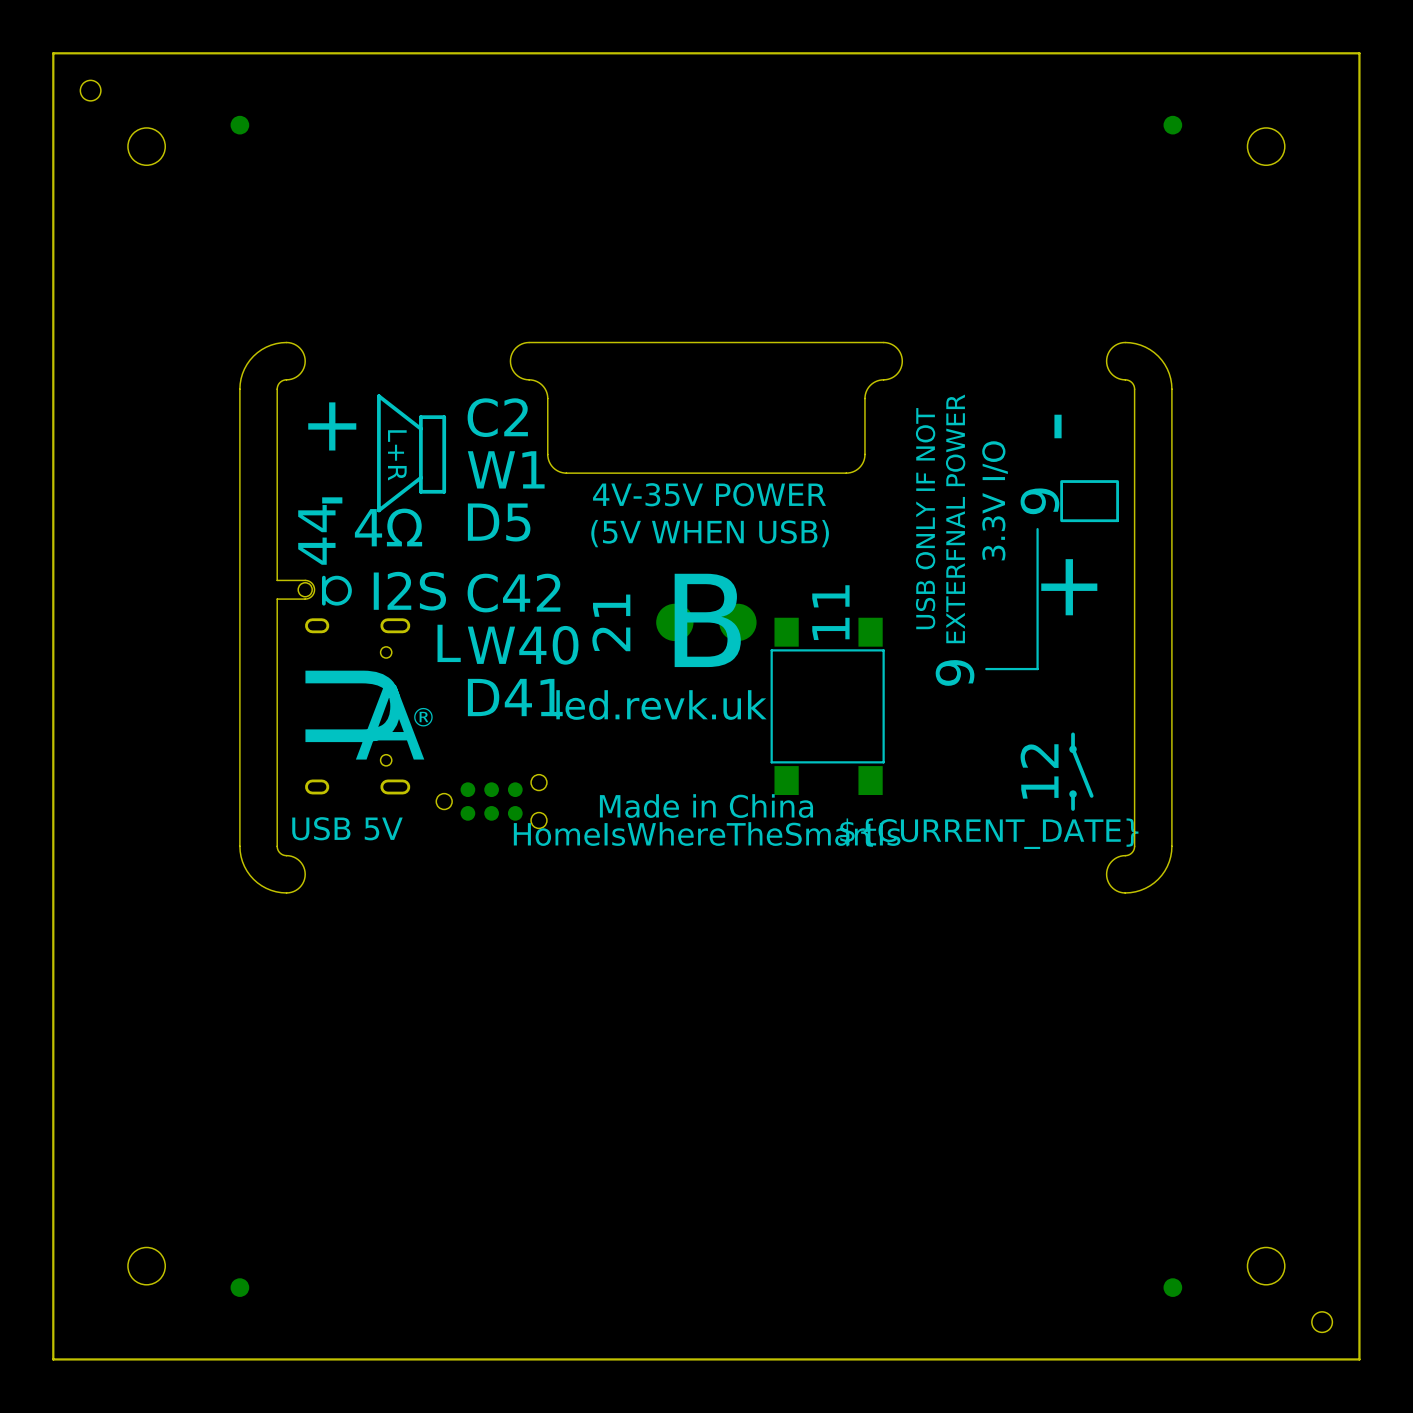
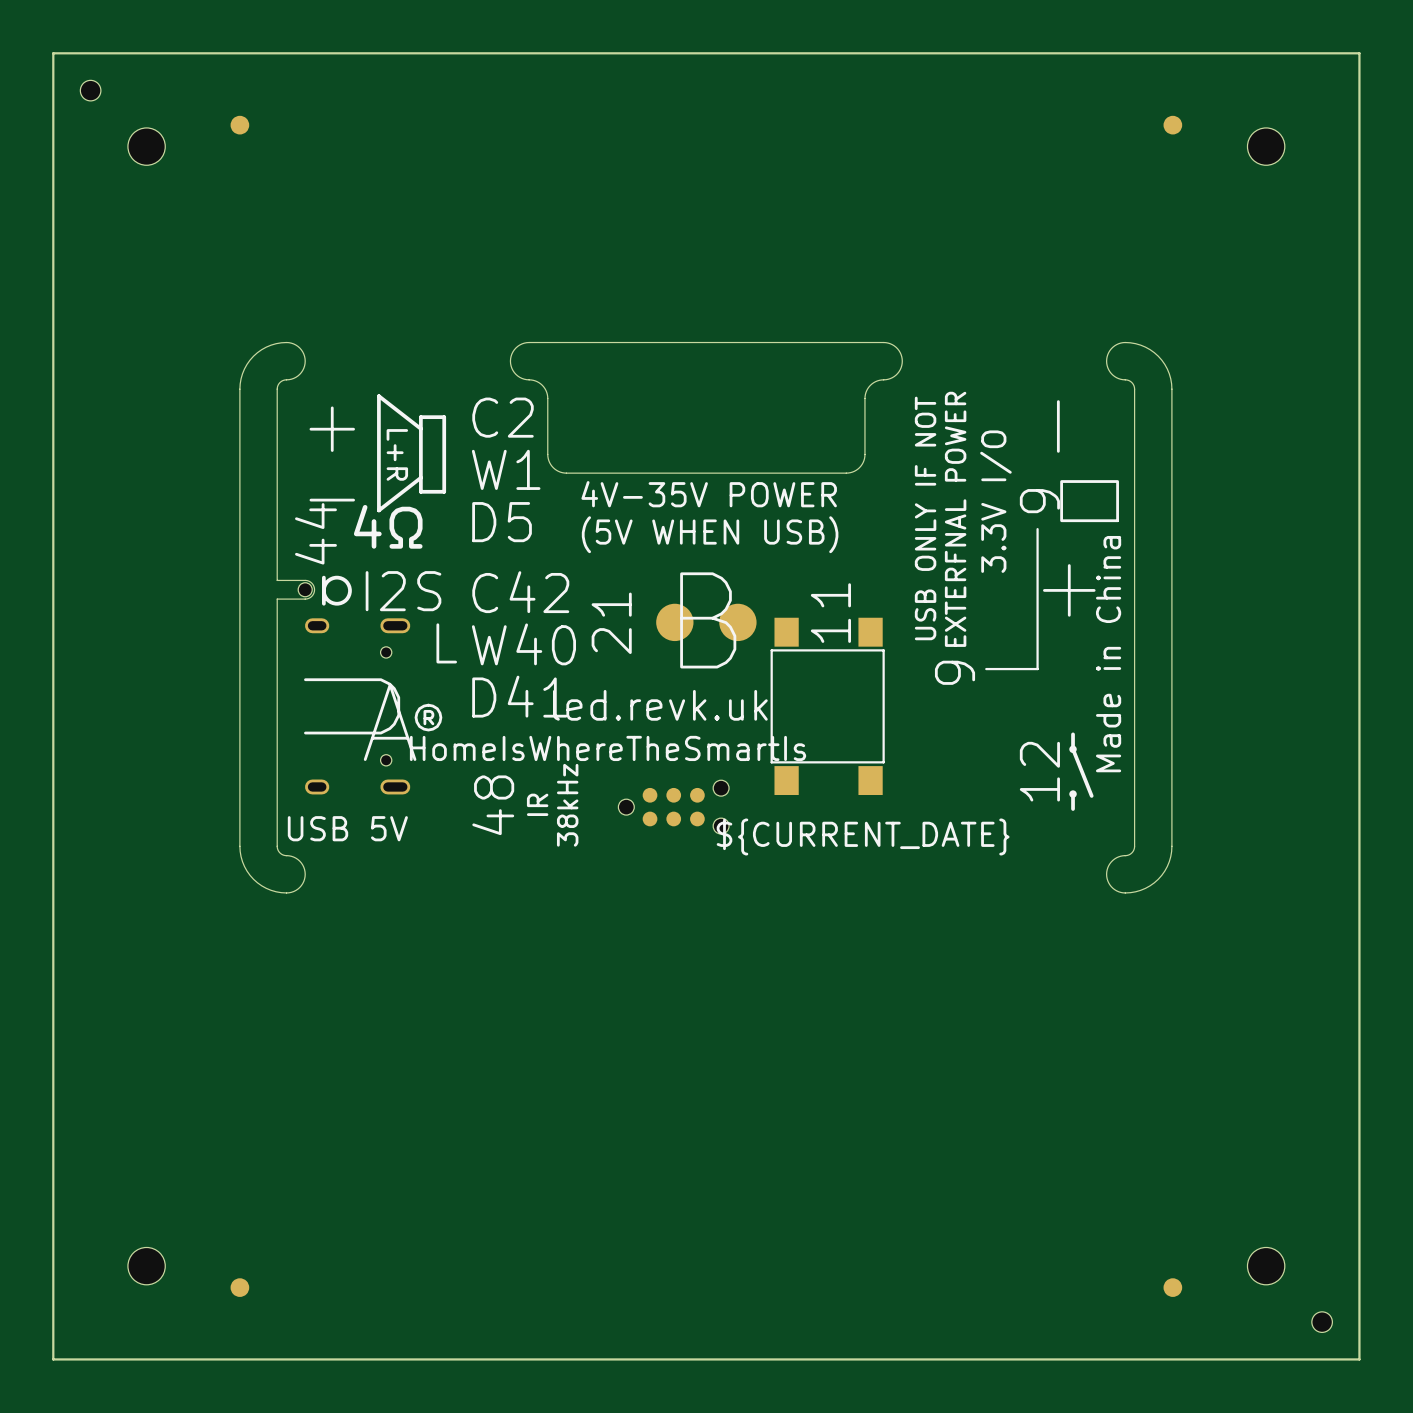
part position: (491, 801) -> (673, 807)
text: none -> IR (537, 804)
text: none -> 38kHz (567, 805)
text: none -> 48 (493, 805)
text rotation: 0° (706, 806) -> 90° counterclockwise (1108, 654)
text position: Made in China (706, 806) -> Made in China (1108, 654)
text position: ${CURRENT_DATE} (989, 833) -> ${CURRENT_DATE} (863, 836)
text position: HomeIsWhereTheSmartIs (707, 834) -> HomeIsWhereTheSmartIs (608, 748)

